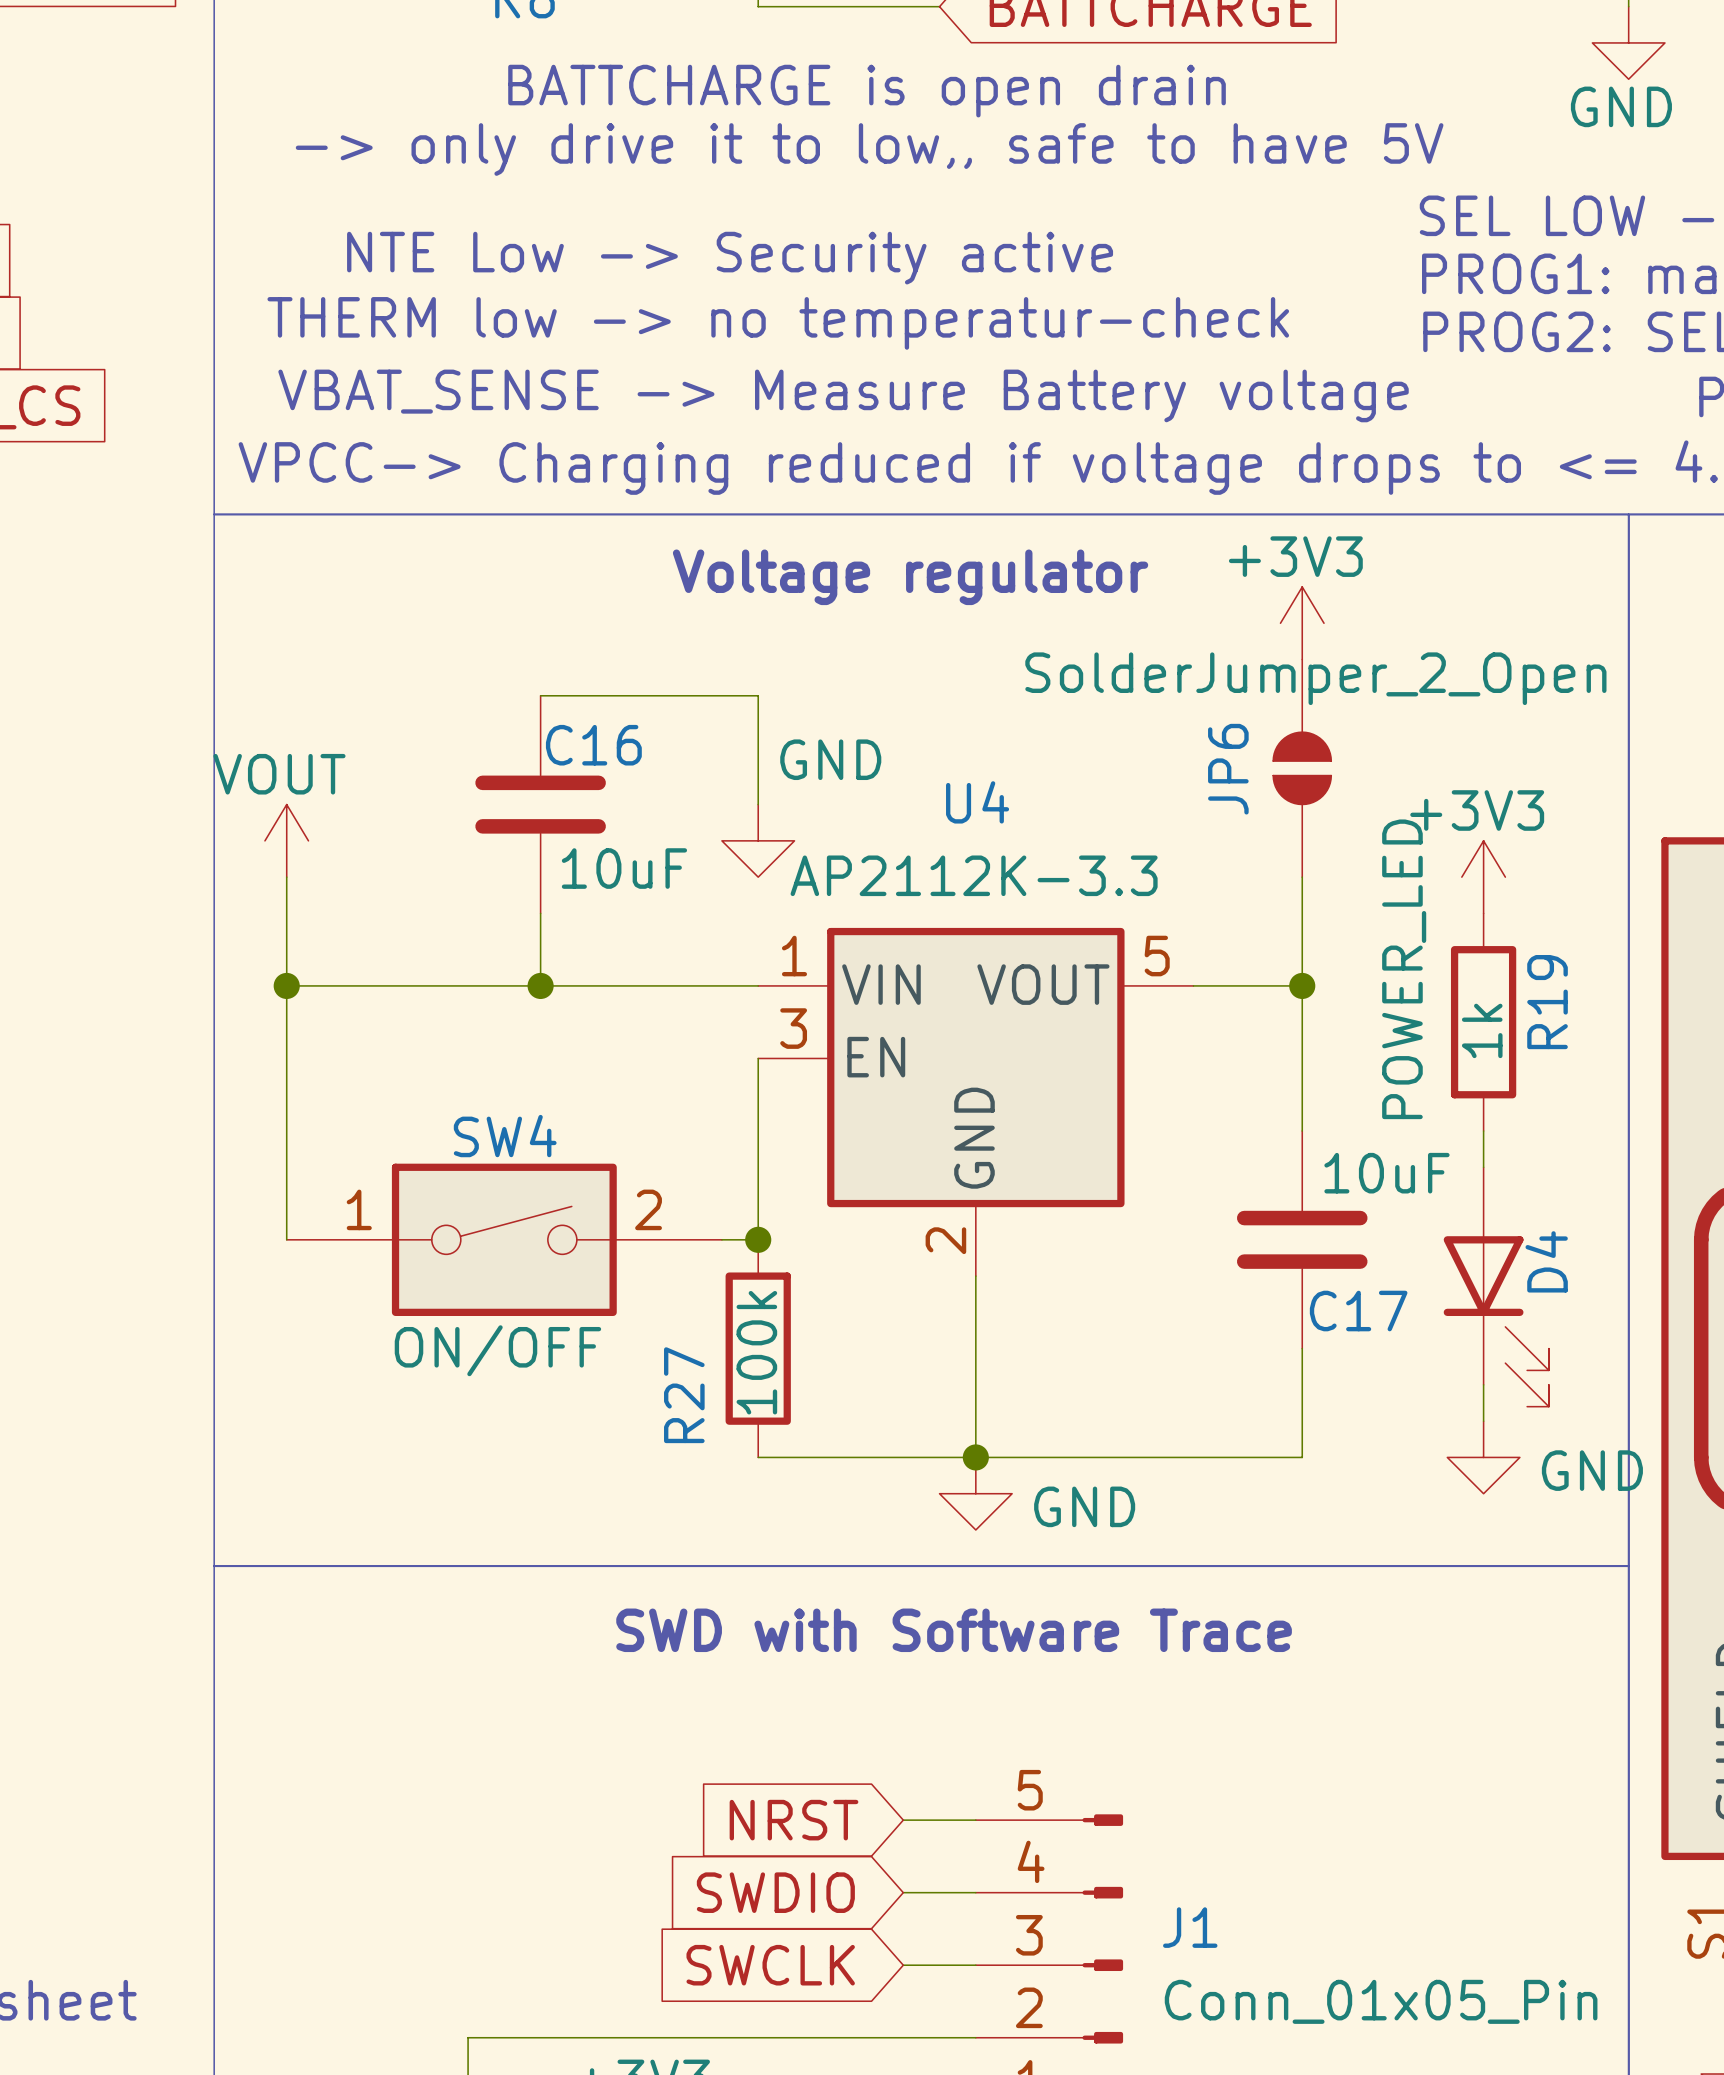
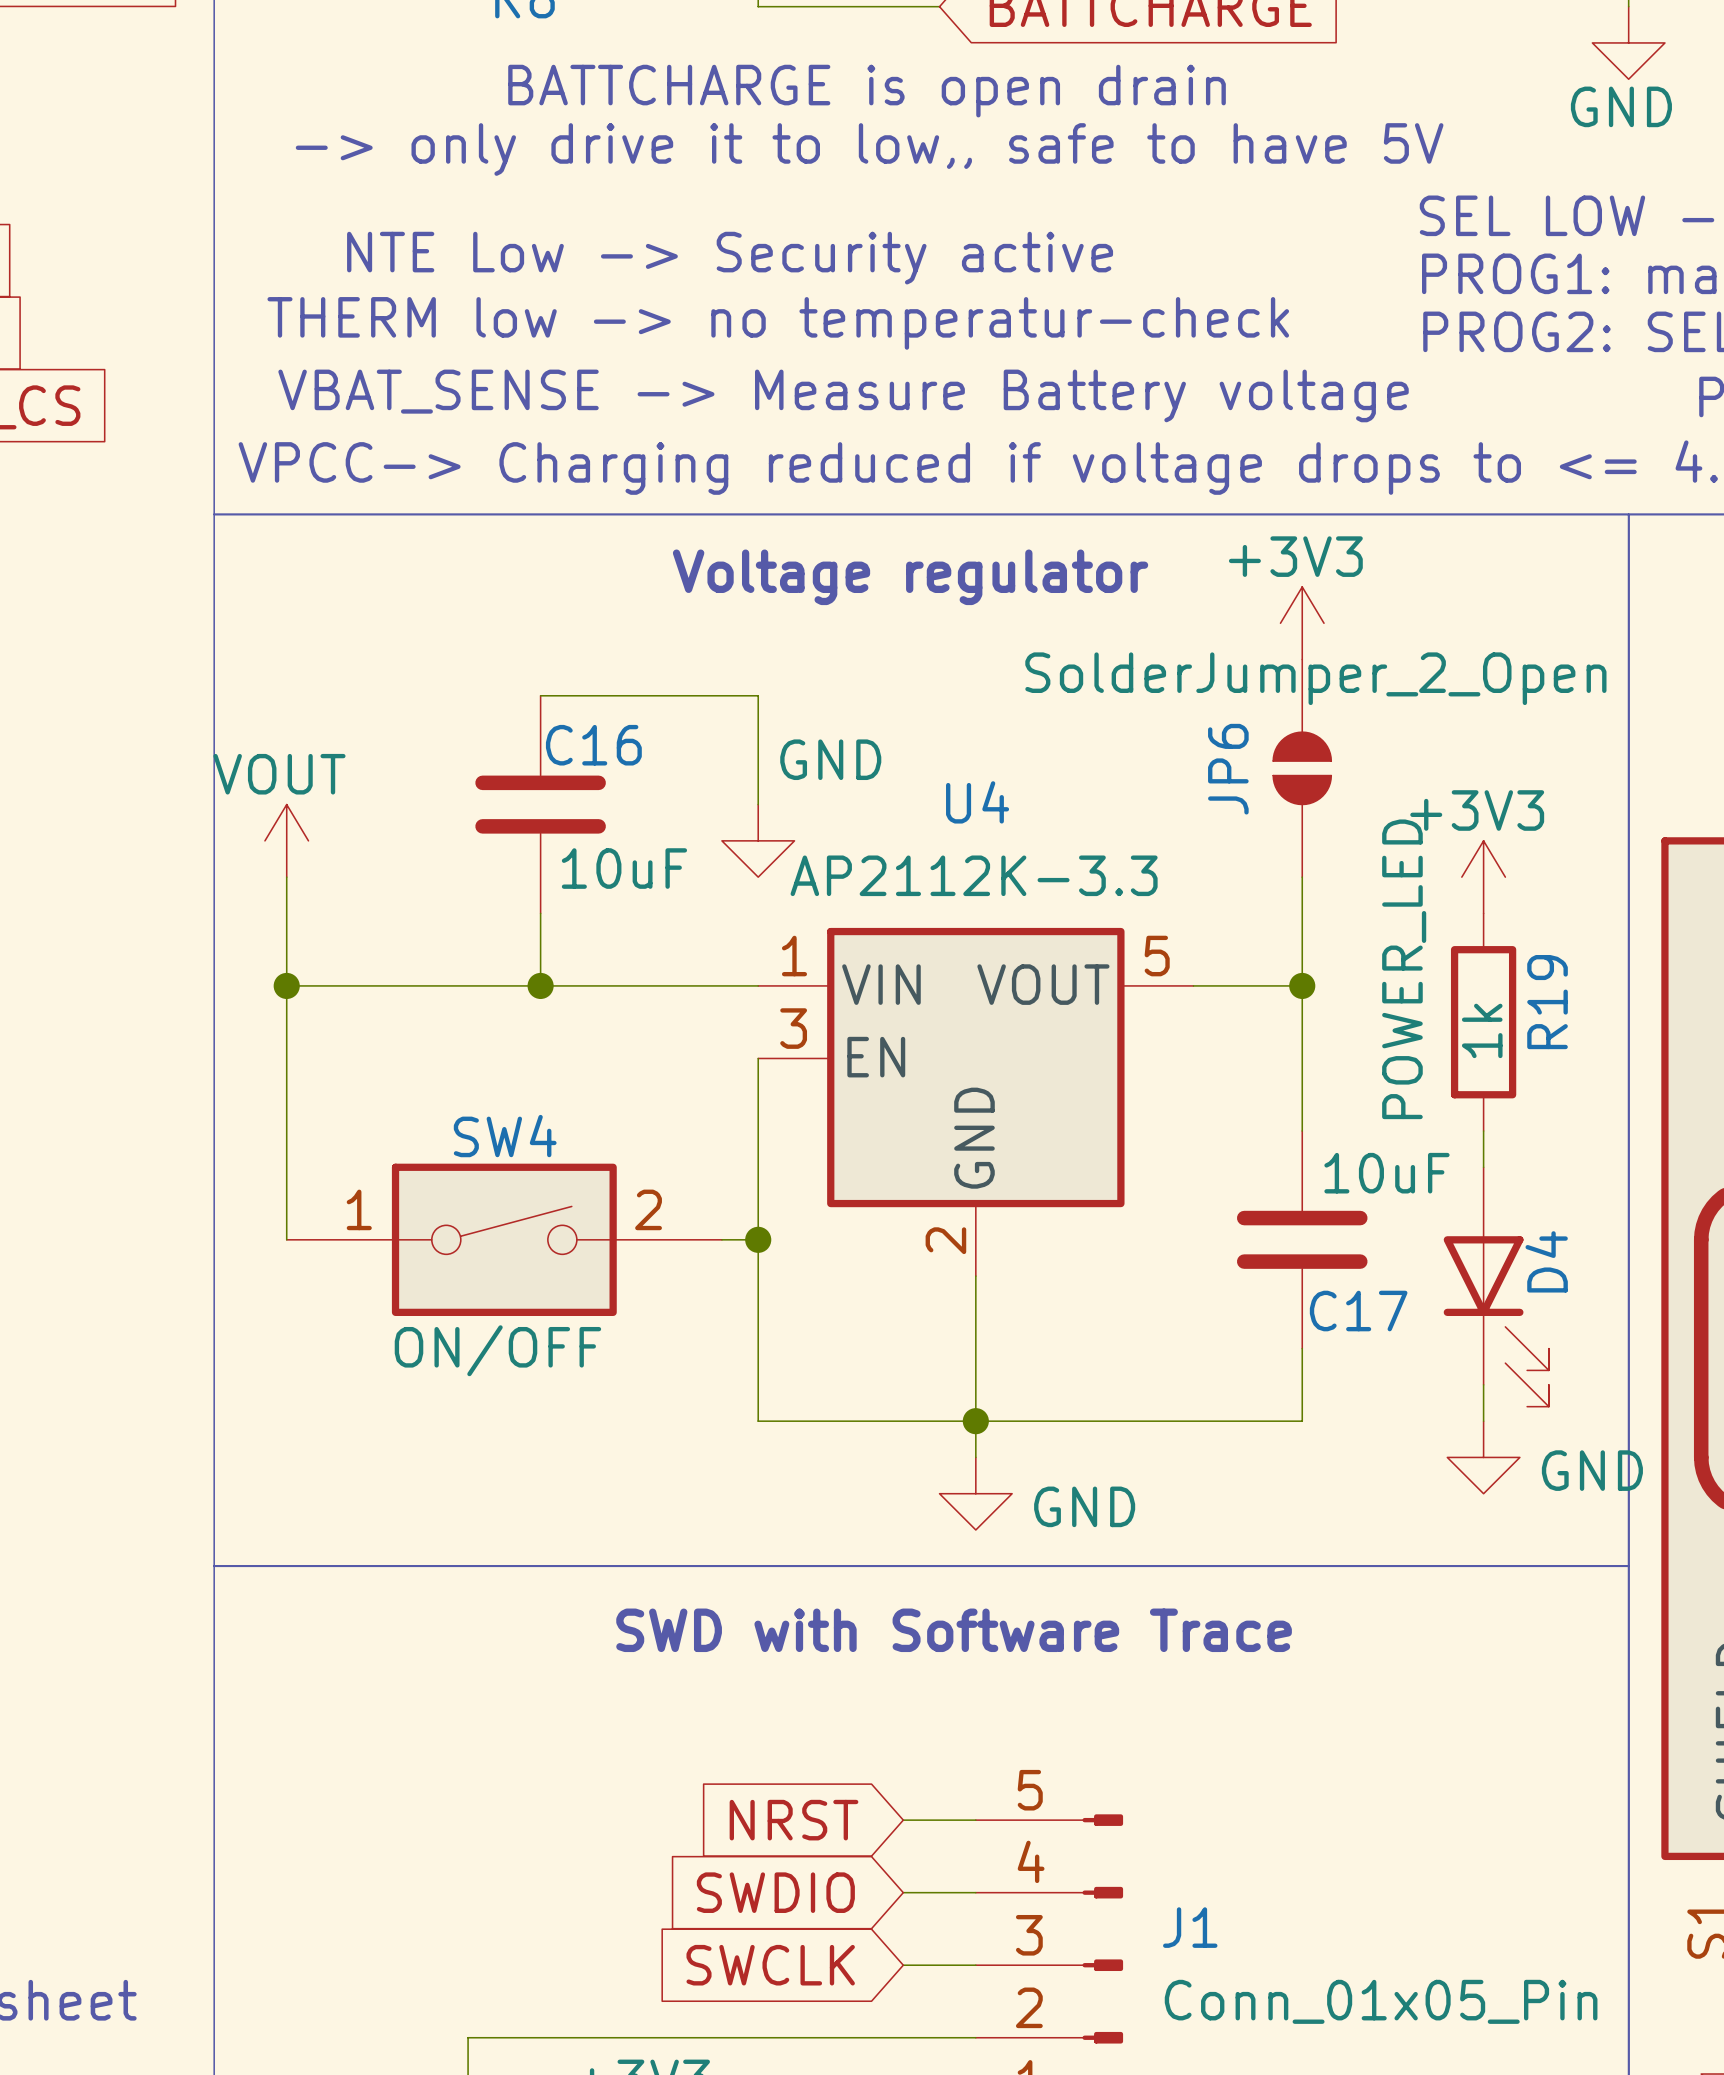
R27: 100k (758, 1348) -> none
wire: (1302, 1421) (1302, 1457) (758, 1457) -> (1302, 1421) (758, 1421) (758, 1239)
junction position: (975, 1457) -> (975, 1421)

